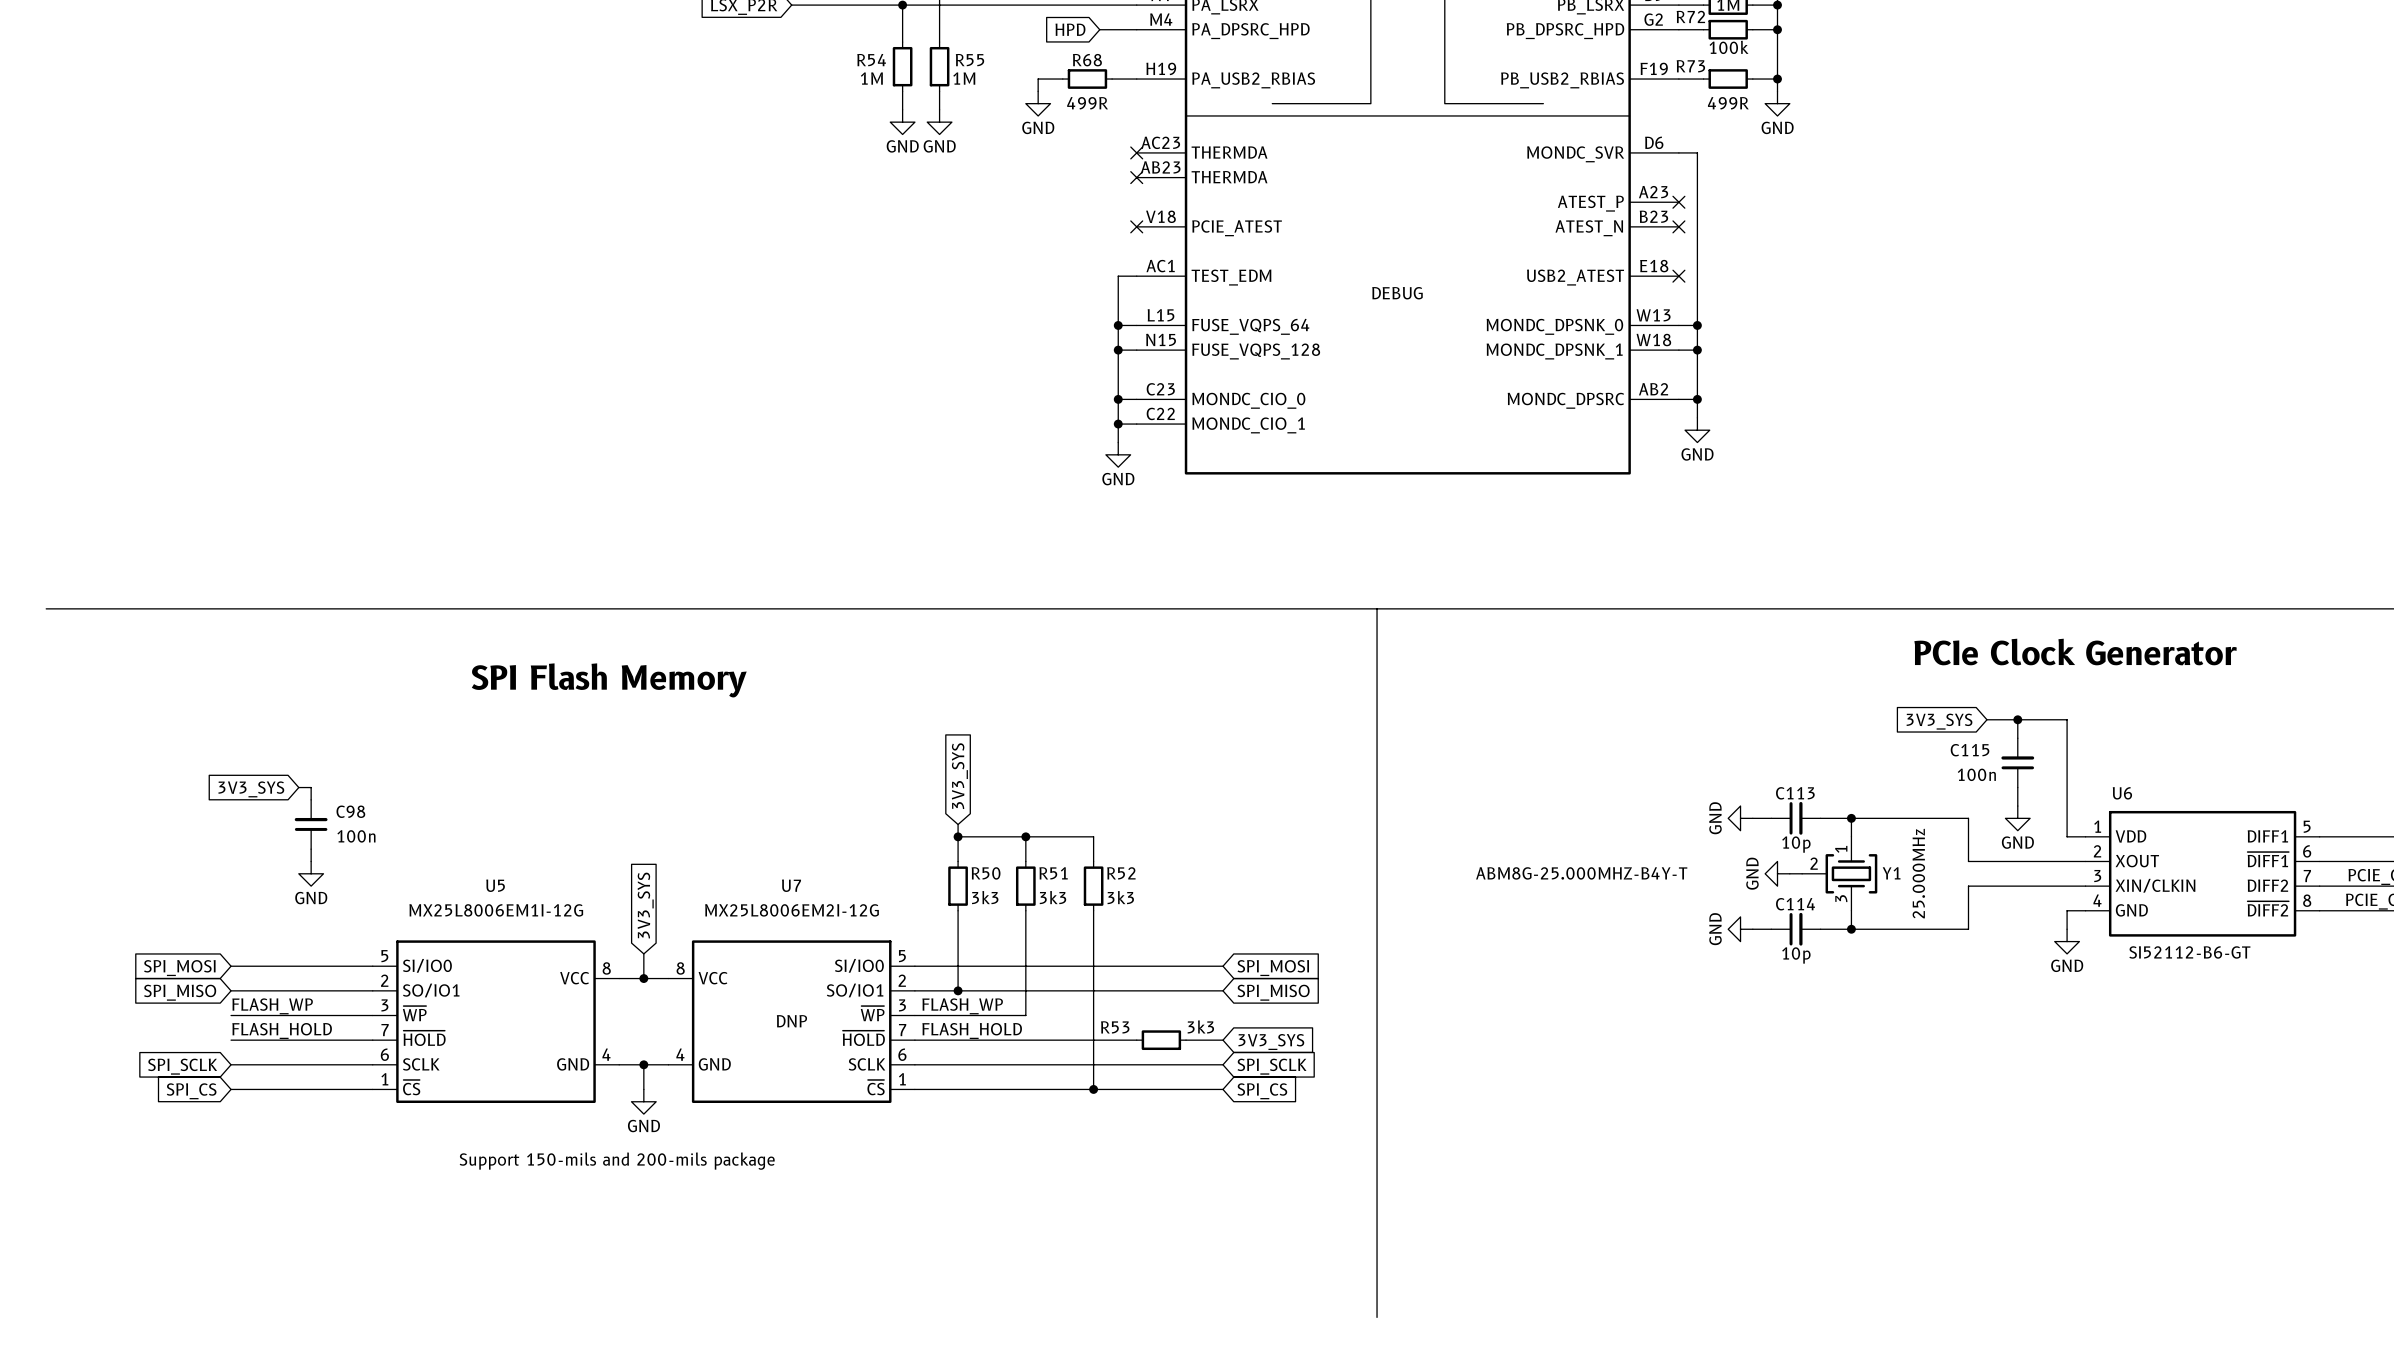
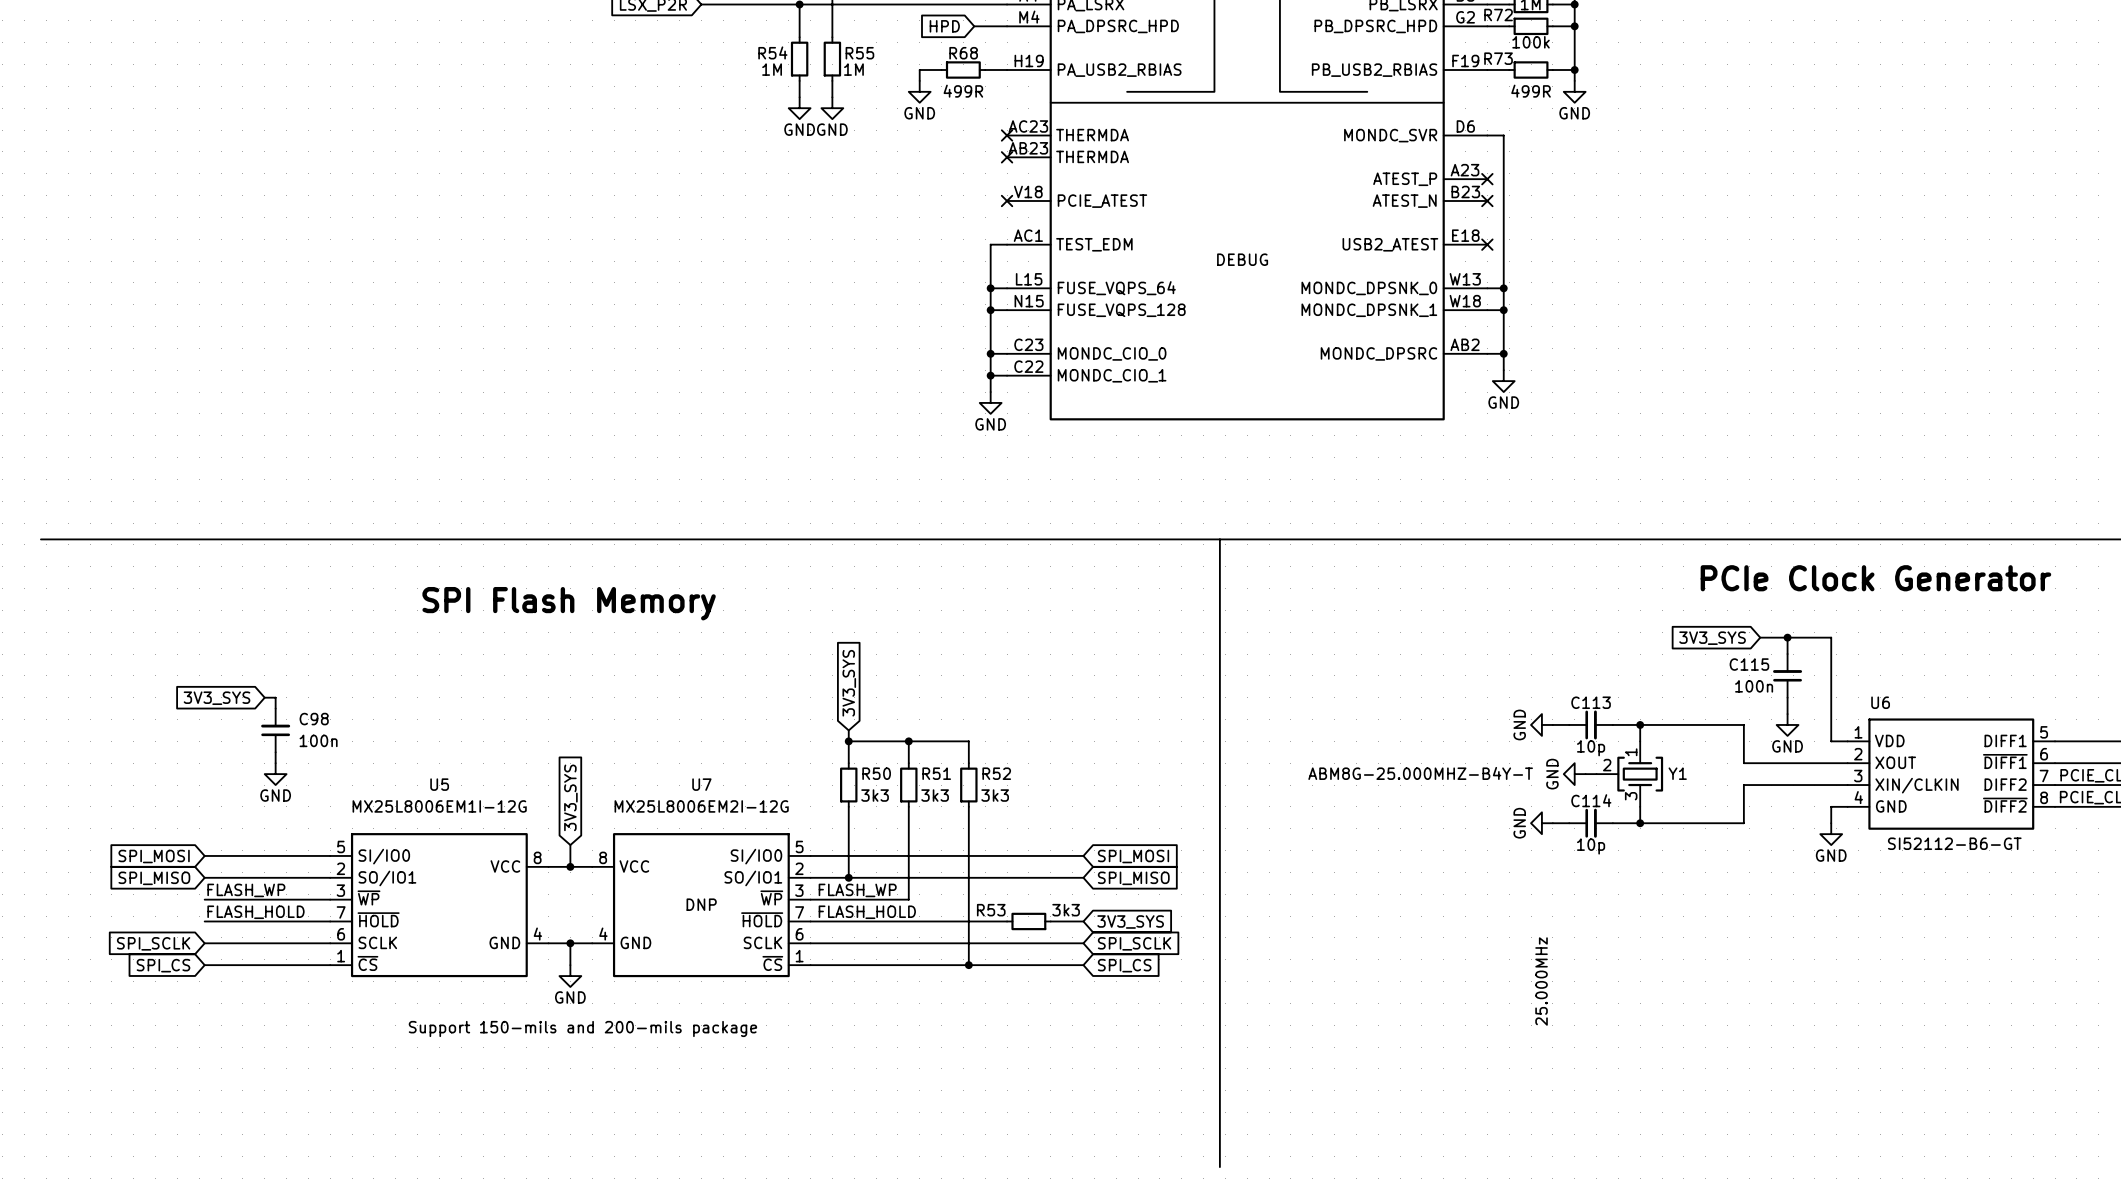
Y1 text position: 25.000MHz (1918, 873) -> 25.000MHz (1541, 981)

